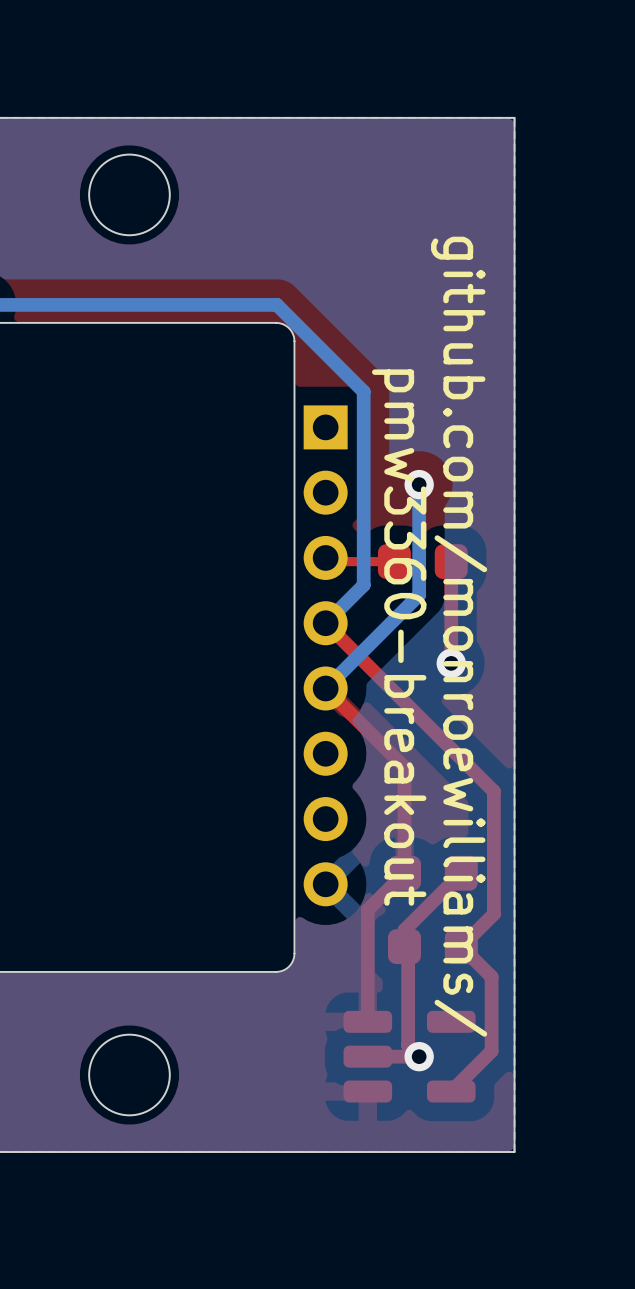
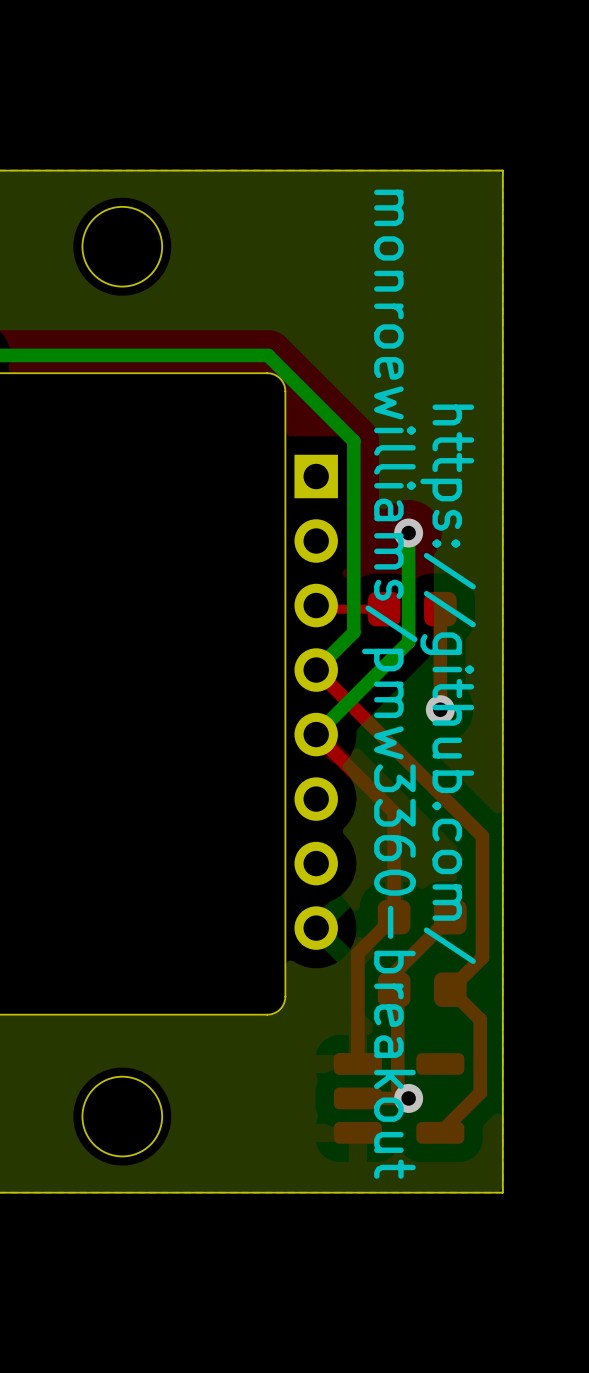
text: github.com/monroewilliams/ (459, 636) -> https://github.com/ (448, 684)
text: pmw3360-breakout (399, 637) -> monroewilliams/pmw3360-breakout (389, 684)

